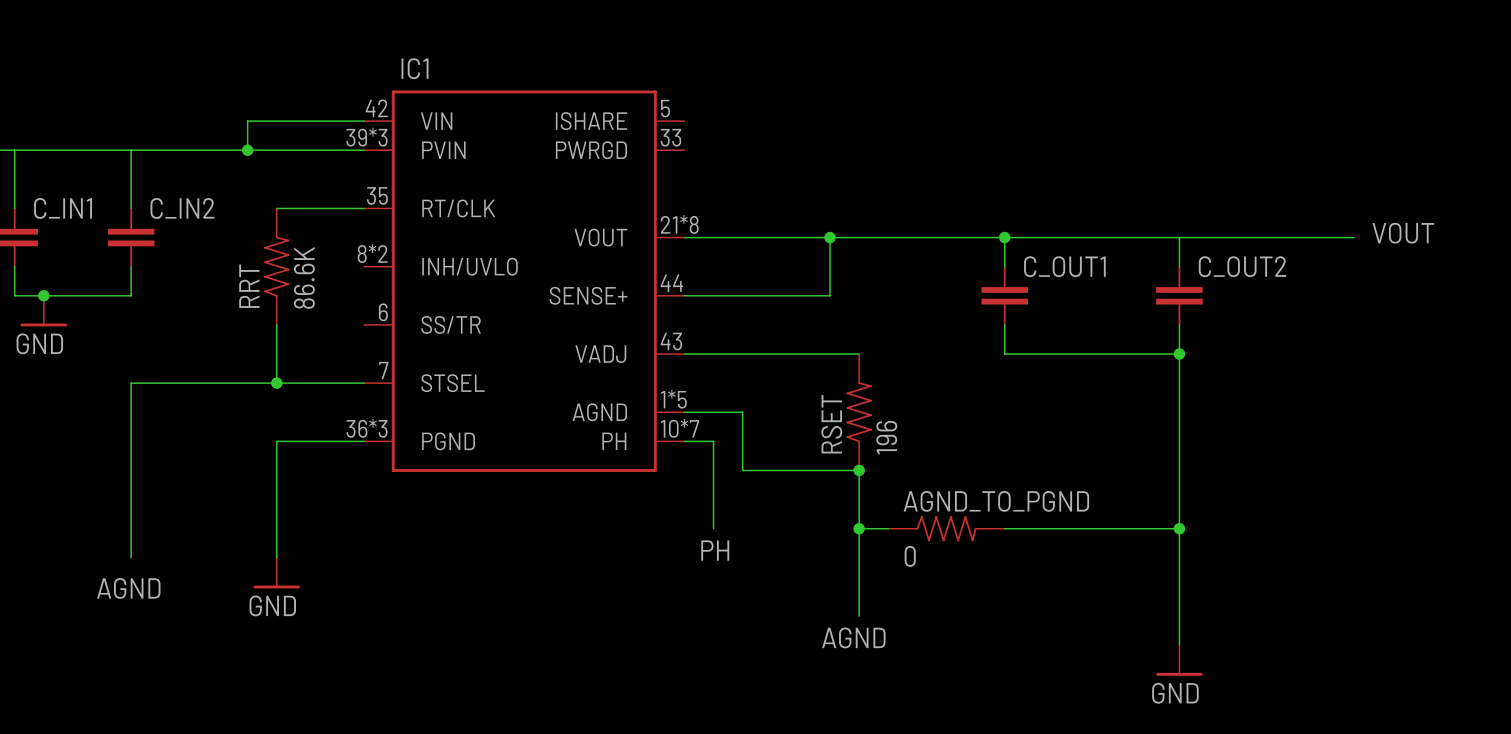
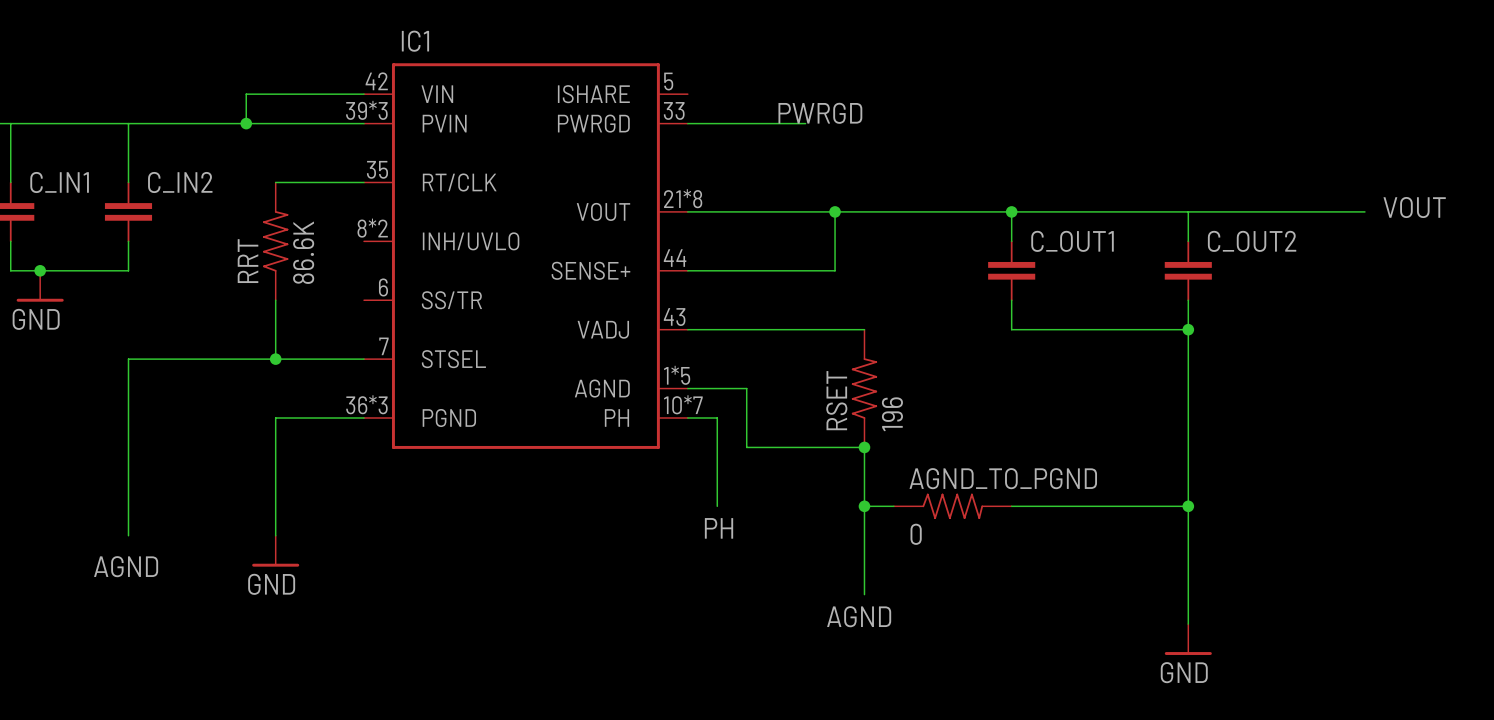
label: none -> PWRGD (820, 113)
wire: none -> (687, 123) (805, 123)

